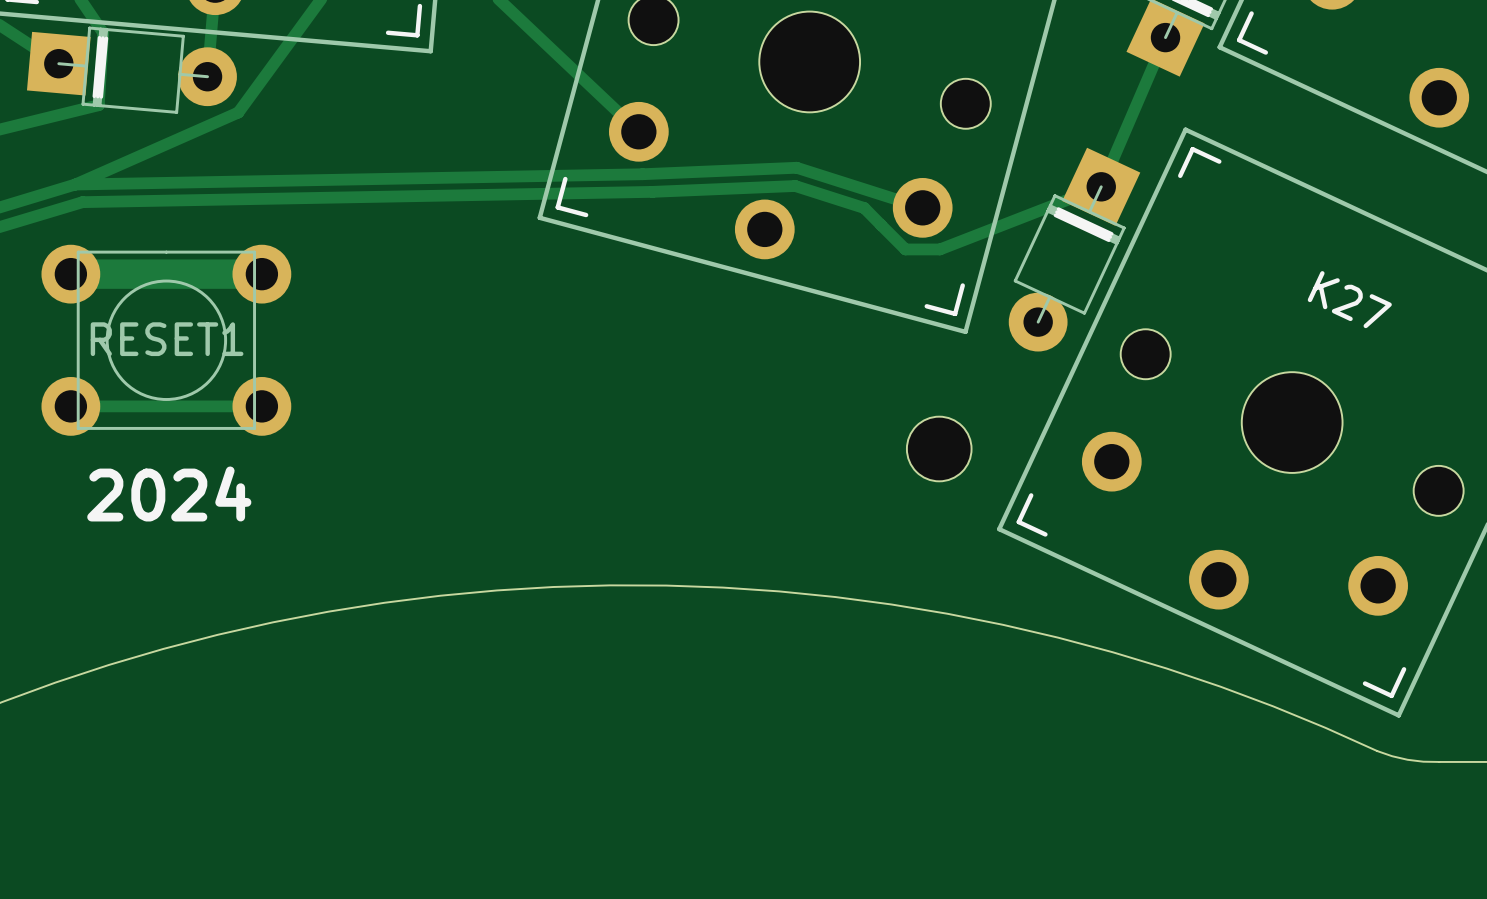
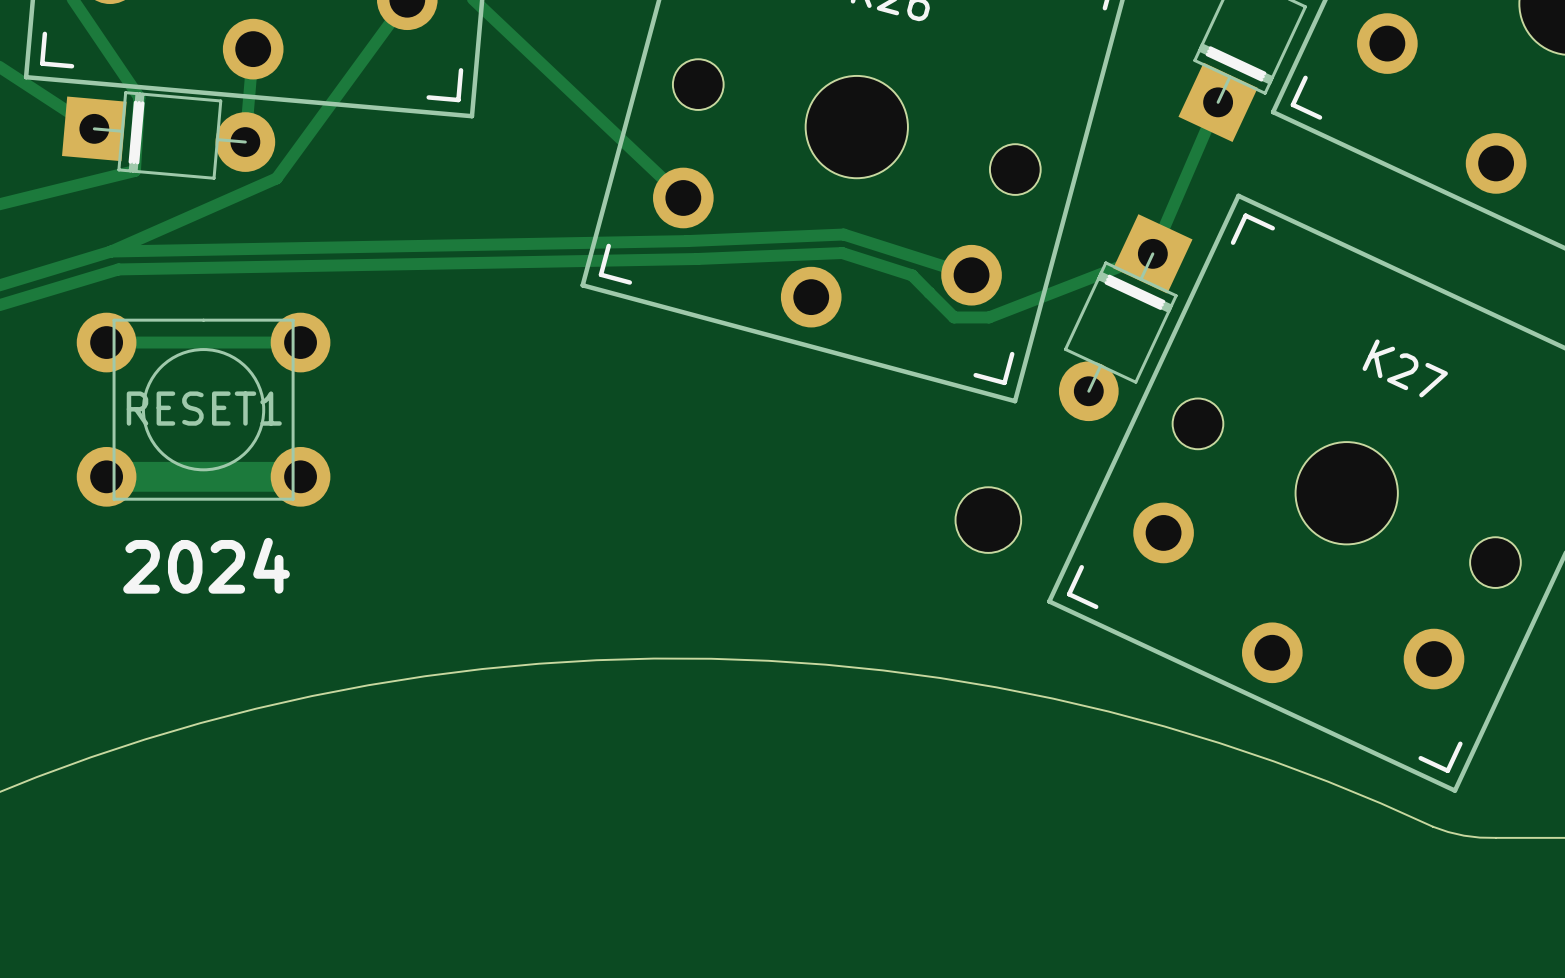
track width: thick (70, 274) (261, 274) -> thin (106, 342) (300, 342)
track width: thin (70, 406) (261, 406) -> thick (106, 476) (300, 476)

